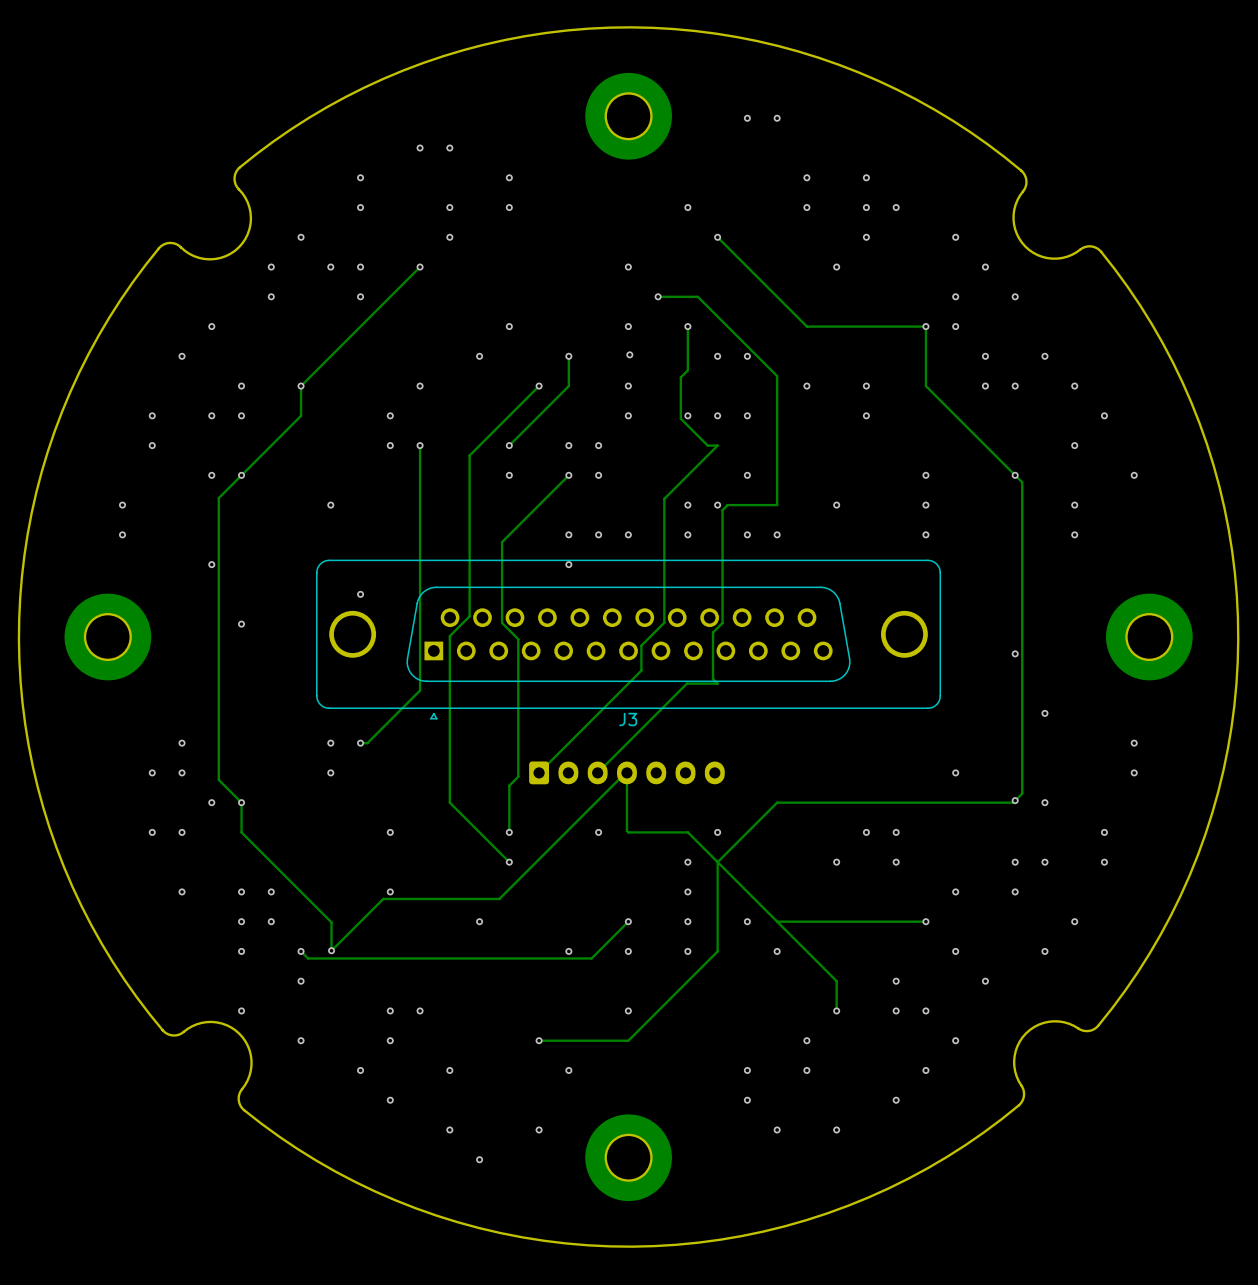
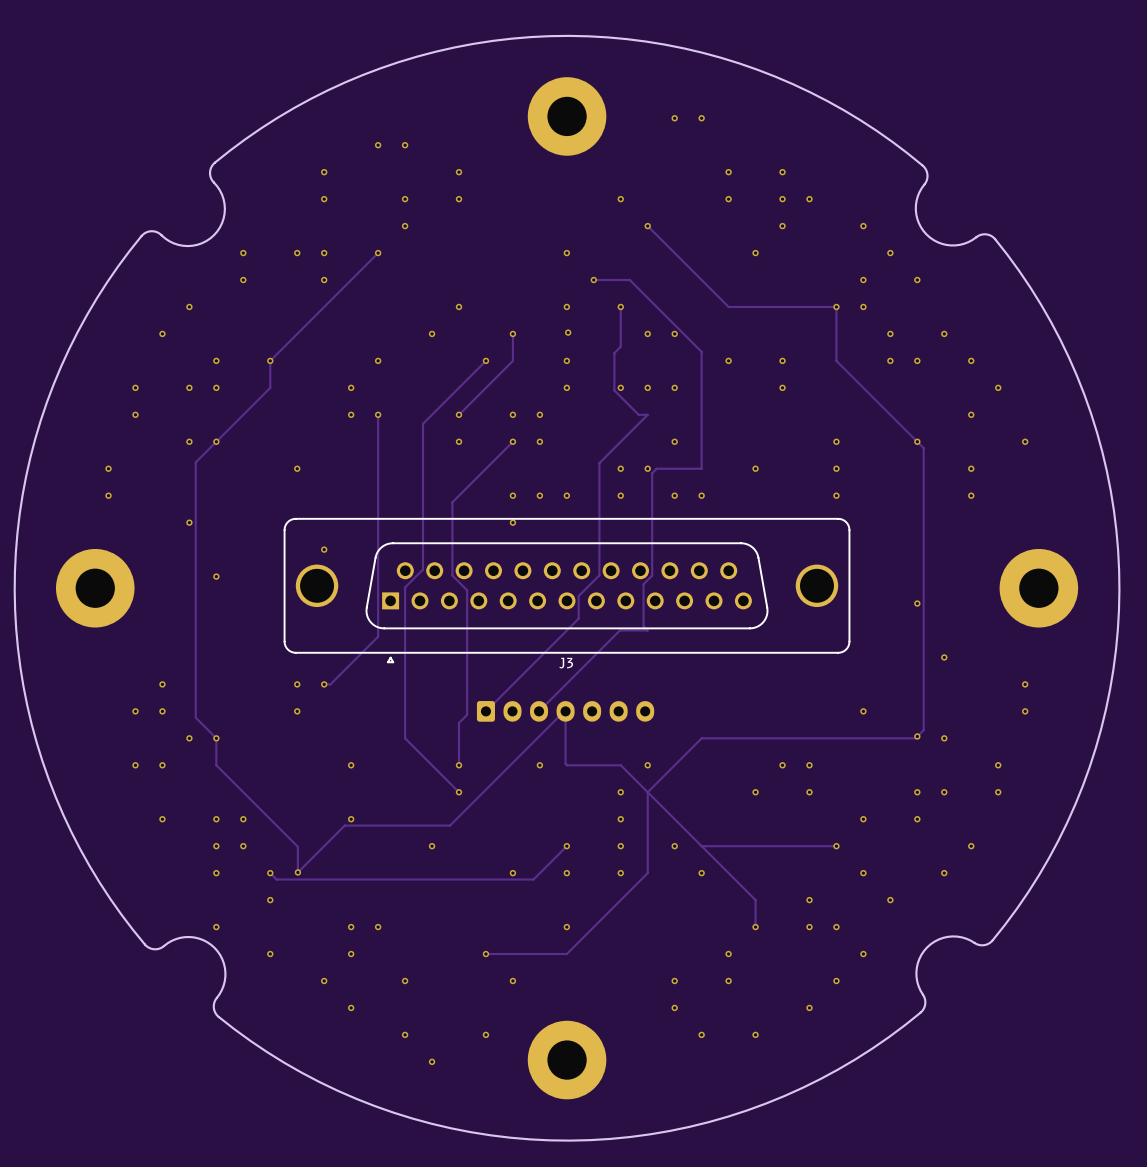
via: (301, 237) -> none

